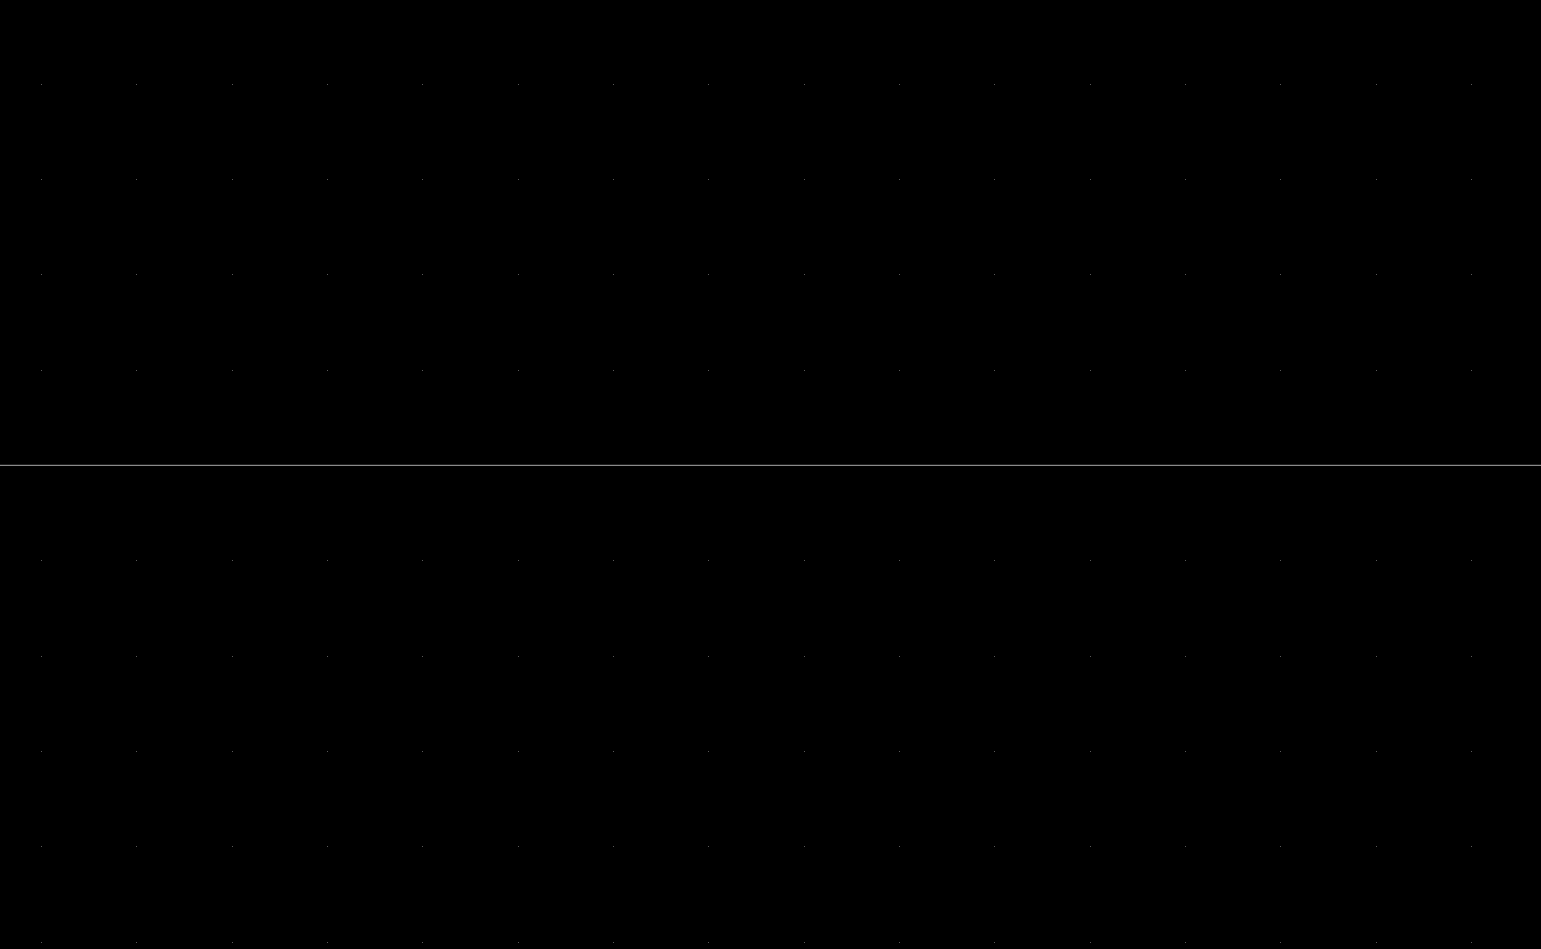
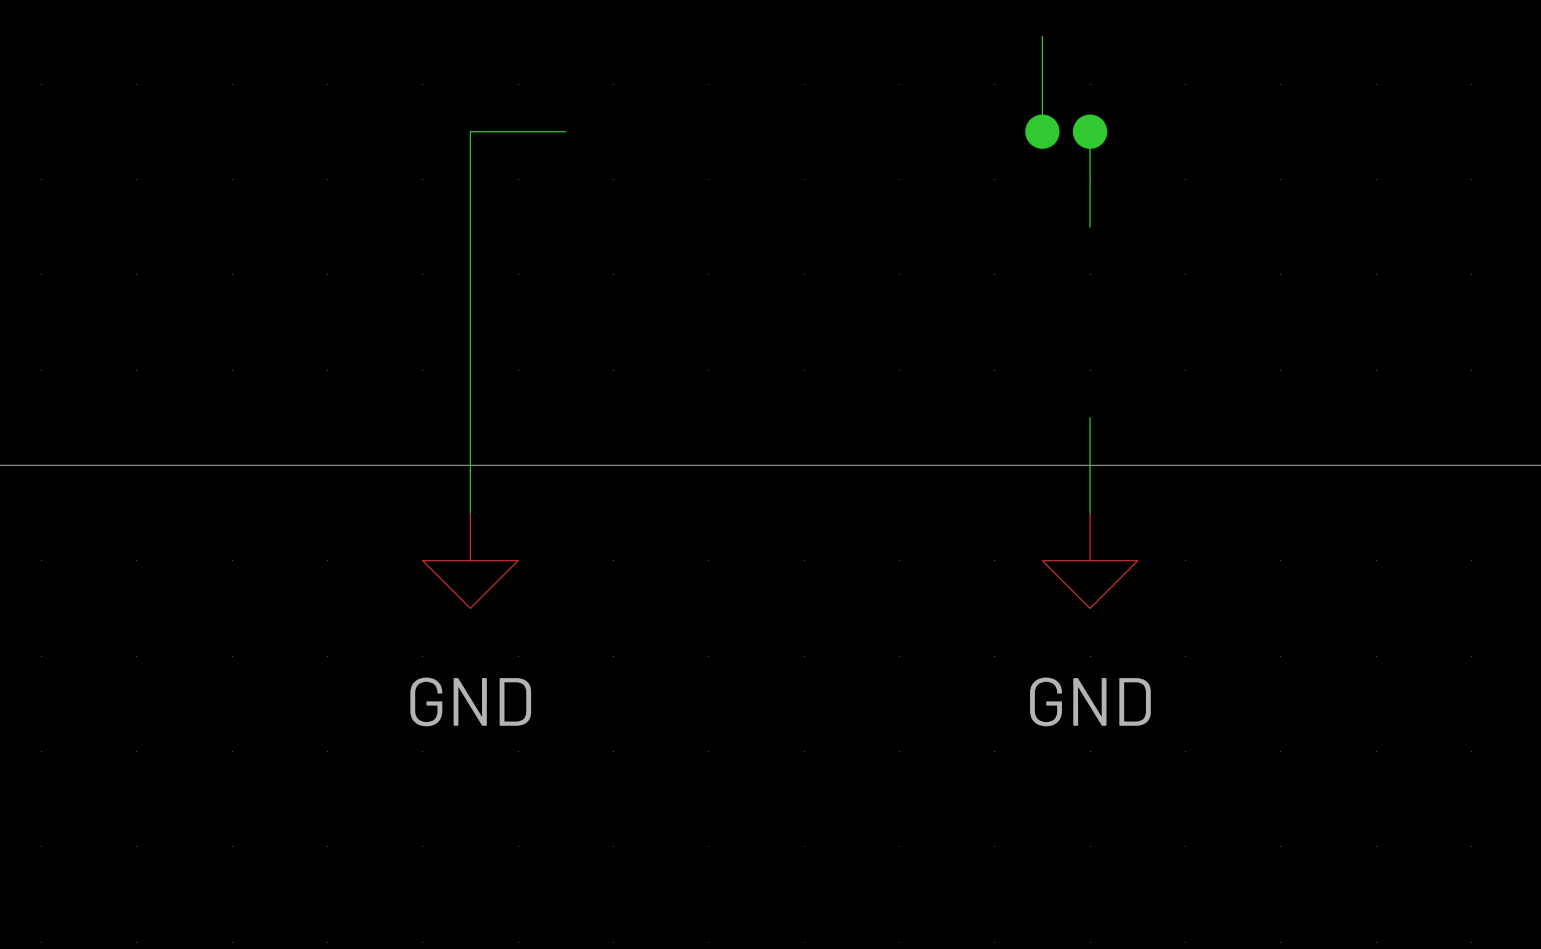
wire: none -> (1042, 36) (1042, 131)
wire: none -> (565, 131) (470, 131) (470, 513)
junction: none -> (1042, 131)
wire: none -> (1090, 131) (1090, 227)
junction: none -> (1090, 131)
wire: none -> (1090, 417) (1090, 513)
power symbol: none -> GND (470, 560)
power symbol: none -> GND (1090, 560)

